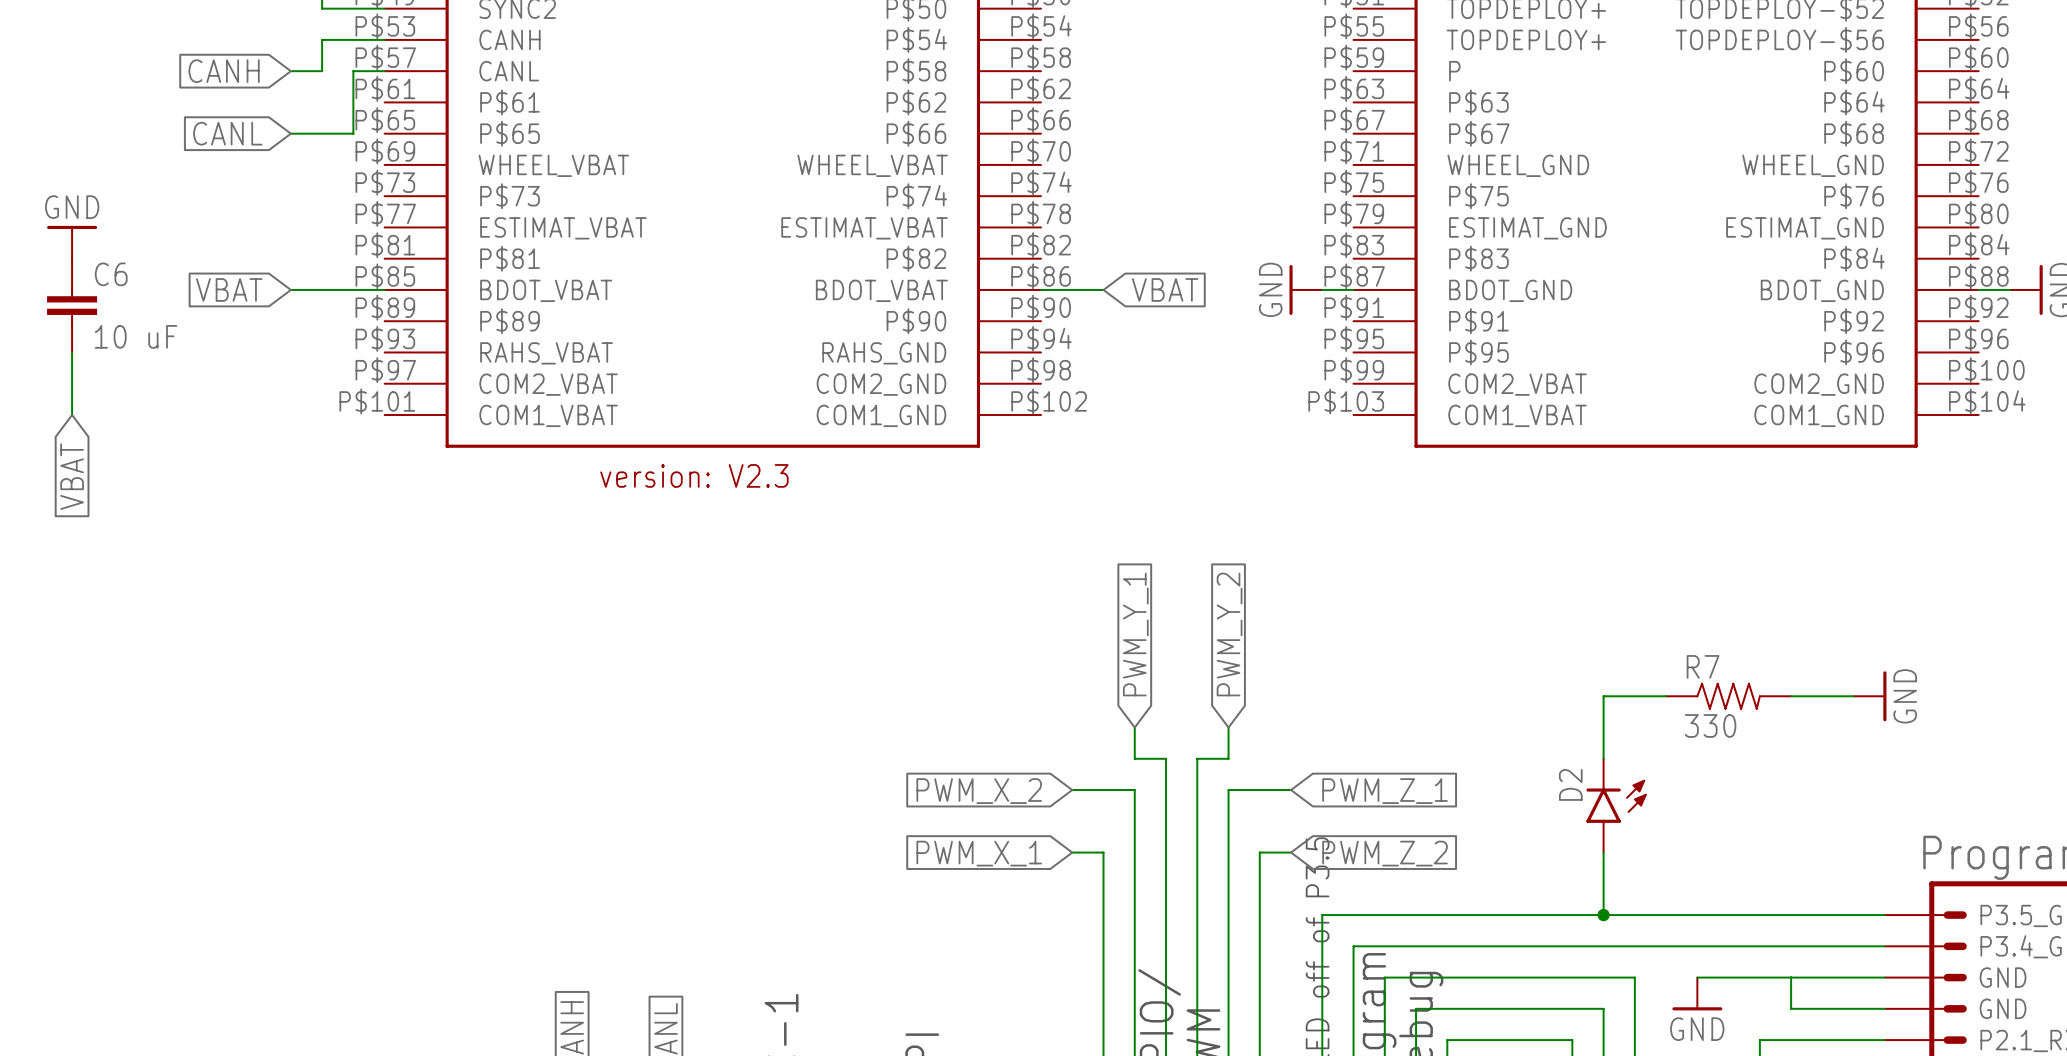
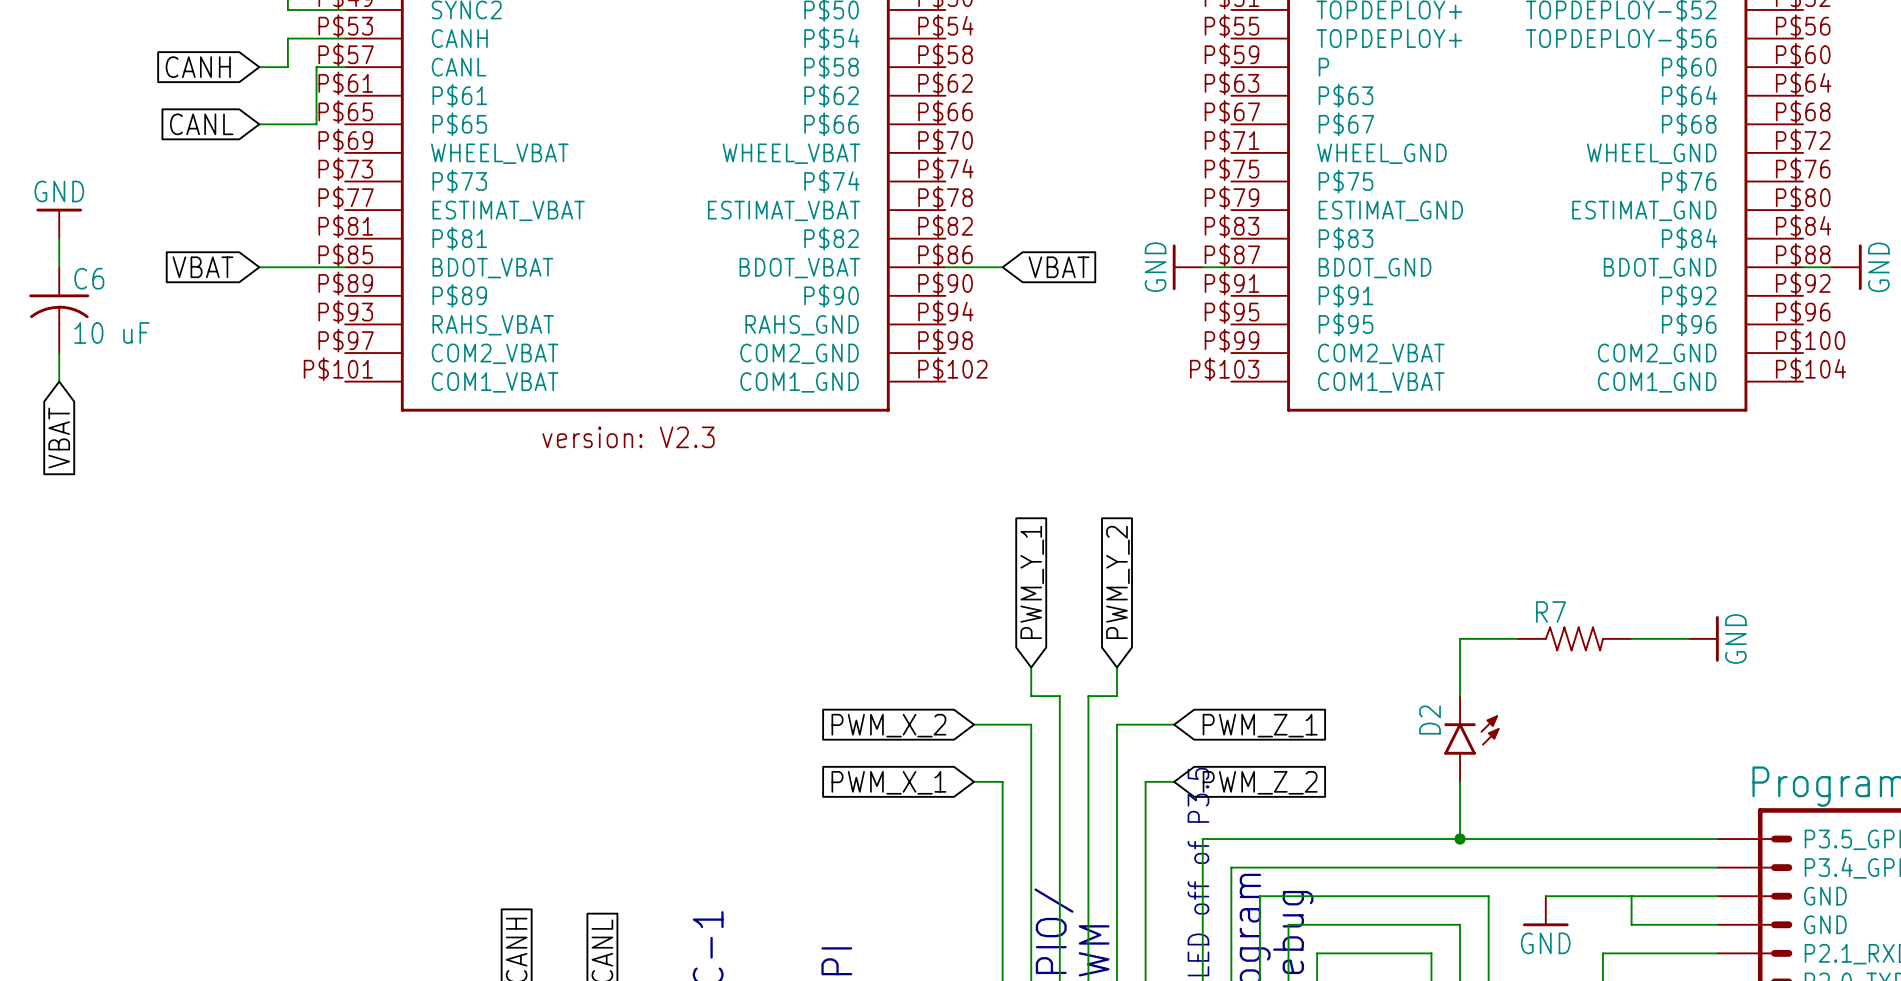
C6 symbol: [47, 258, 98, 353] -> [29, 267, 90, 354]
R7 value: 330 (1710, 725) -> none

